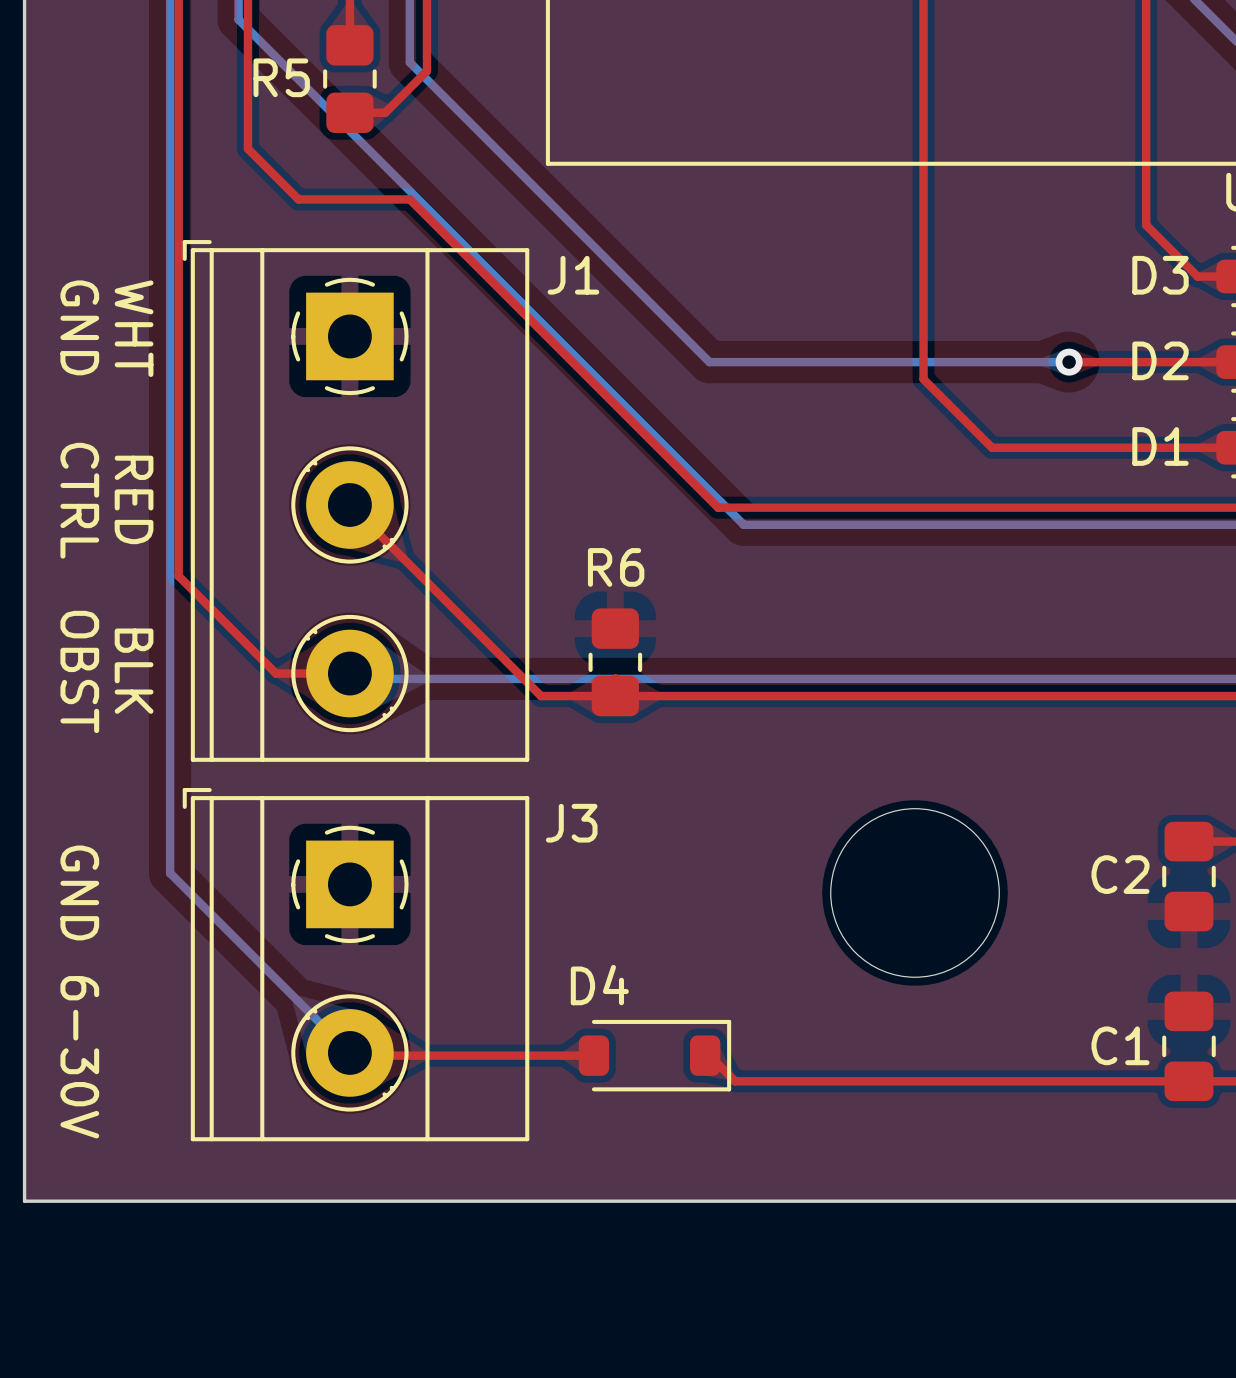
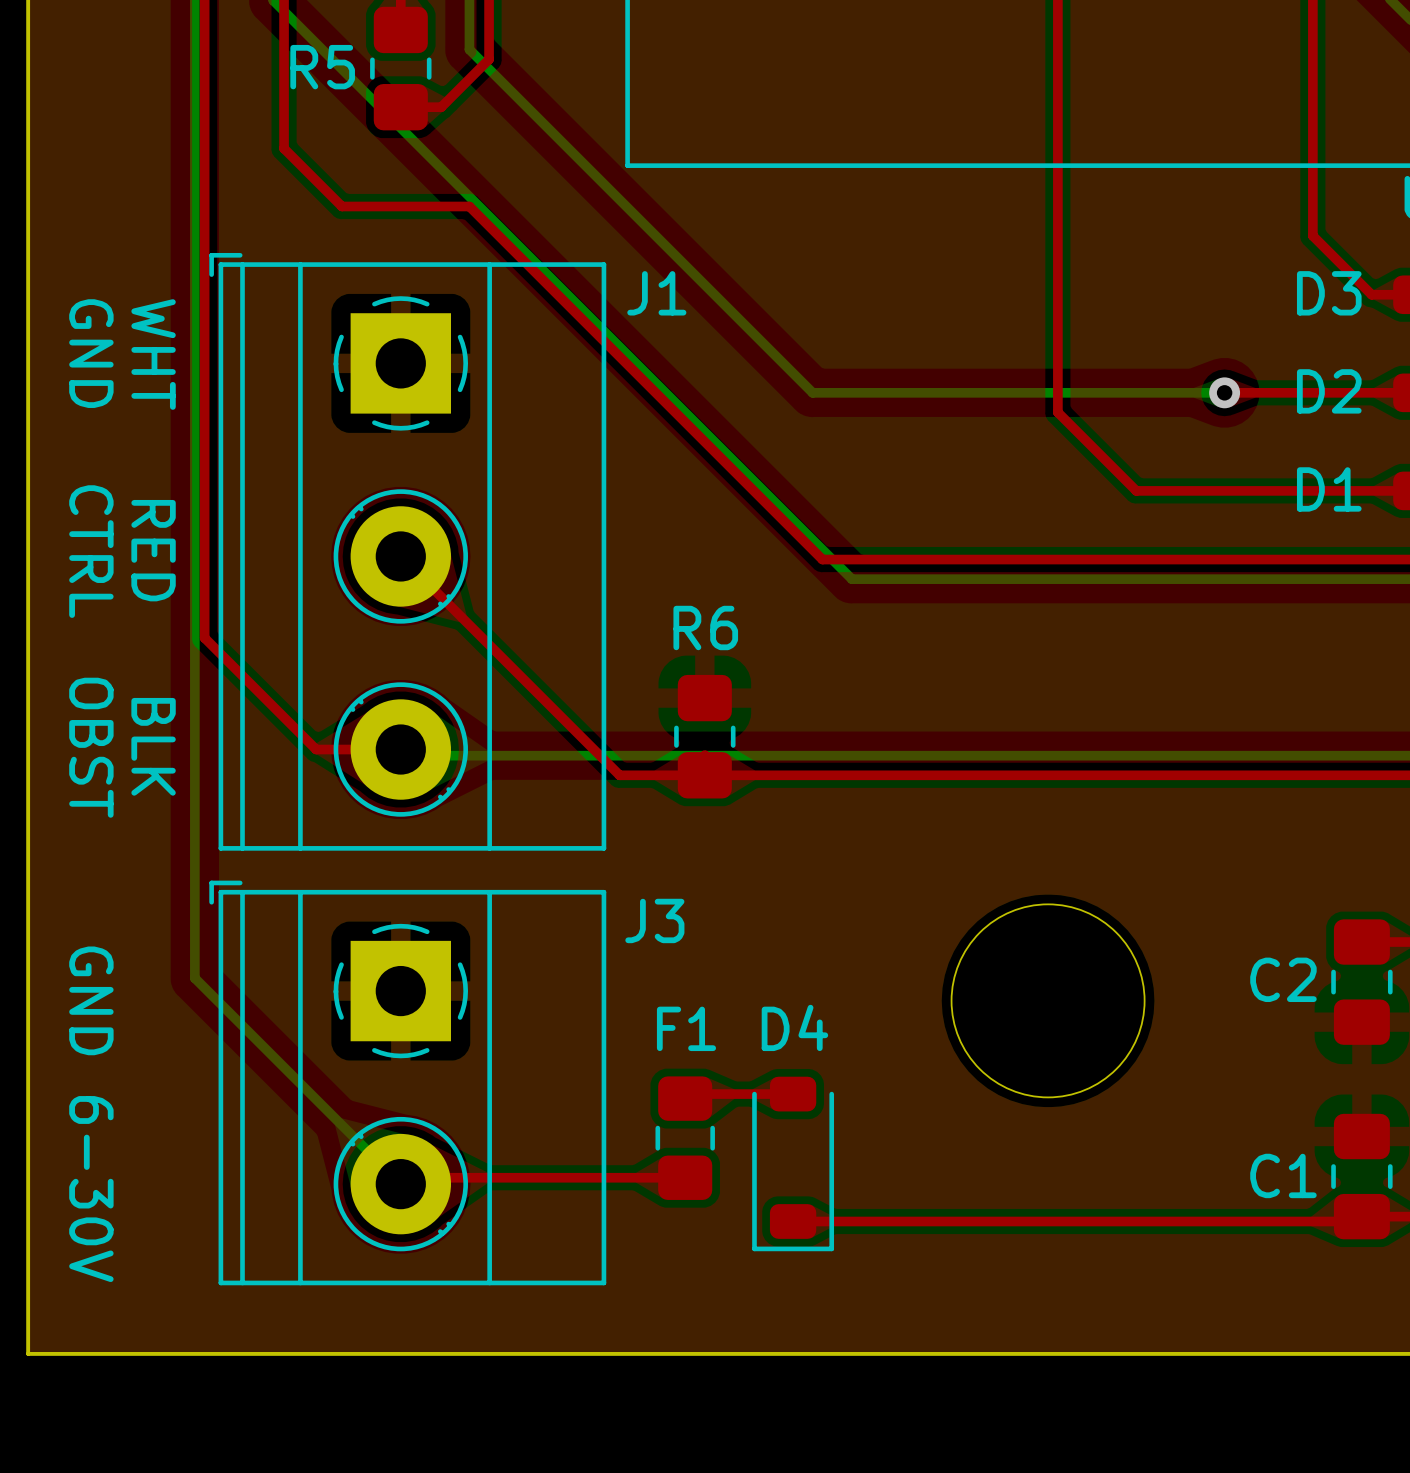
top track: none -> (793, 1094) (689, 1094) (685, 1098)
D4 name position: D4 (599, 985) -> D4 (794, 1027)
F1: none -> (685, 1138)
top track: none -> (685, 1177) (407, 1177) (400, 1184)
top track: (352, 1055) (585, 1055) -> none
D4 rotation: 0° (654, 1055) -> 90° clockwise (793, 1163)
top track: (709, 1055) (735, 1081) (1188, 1081) -> (793, 1221) (1357, 1221) (1361, 1216)

